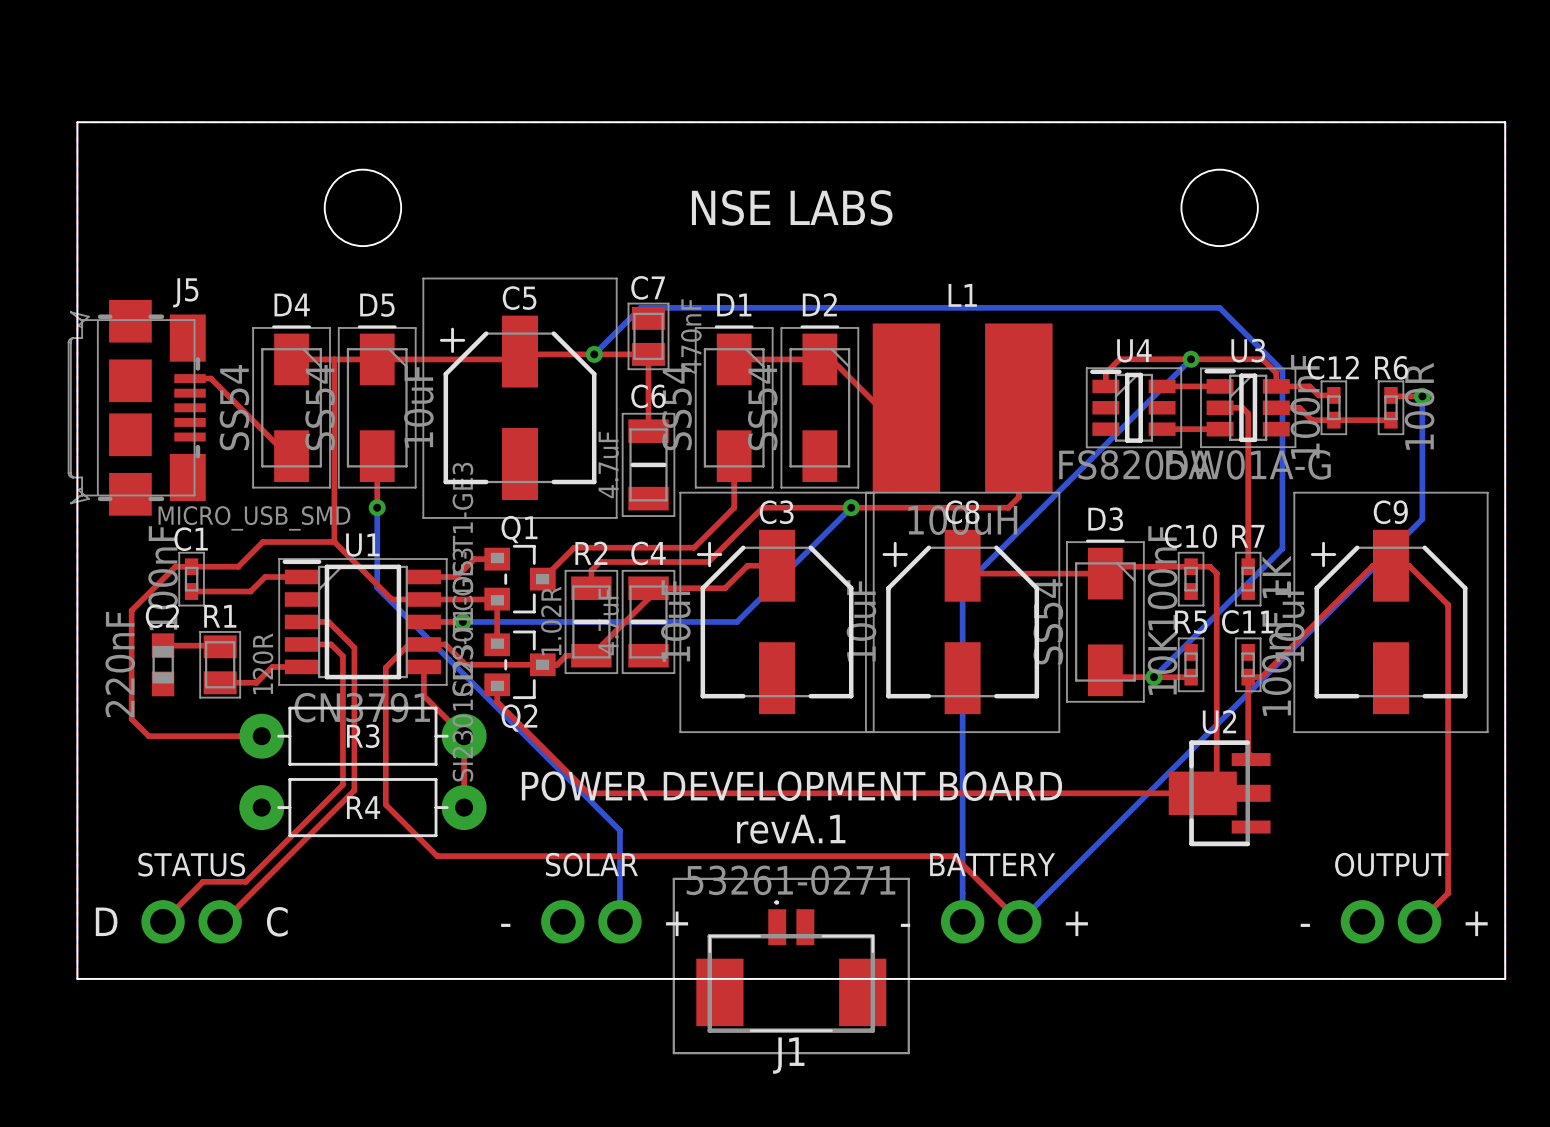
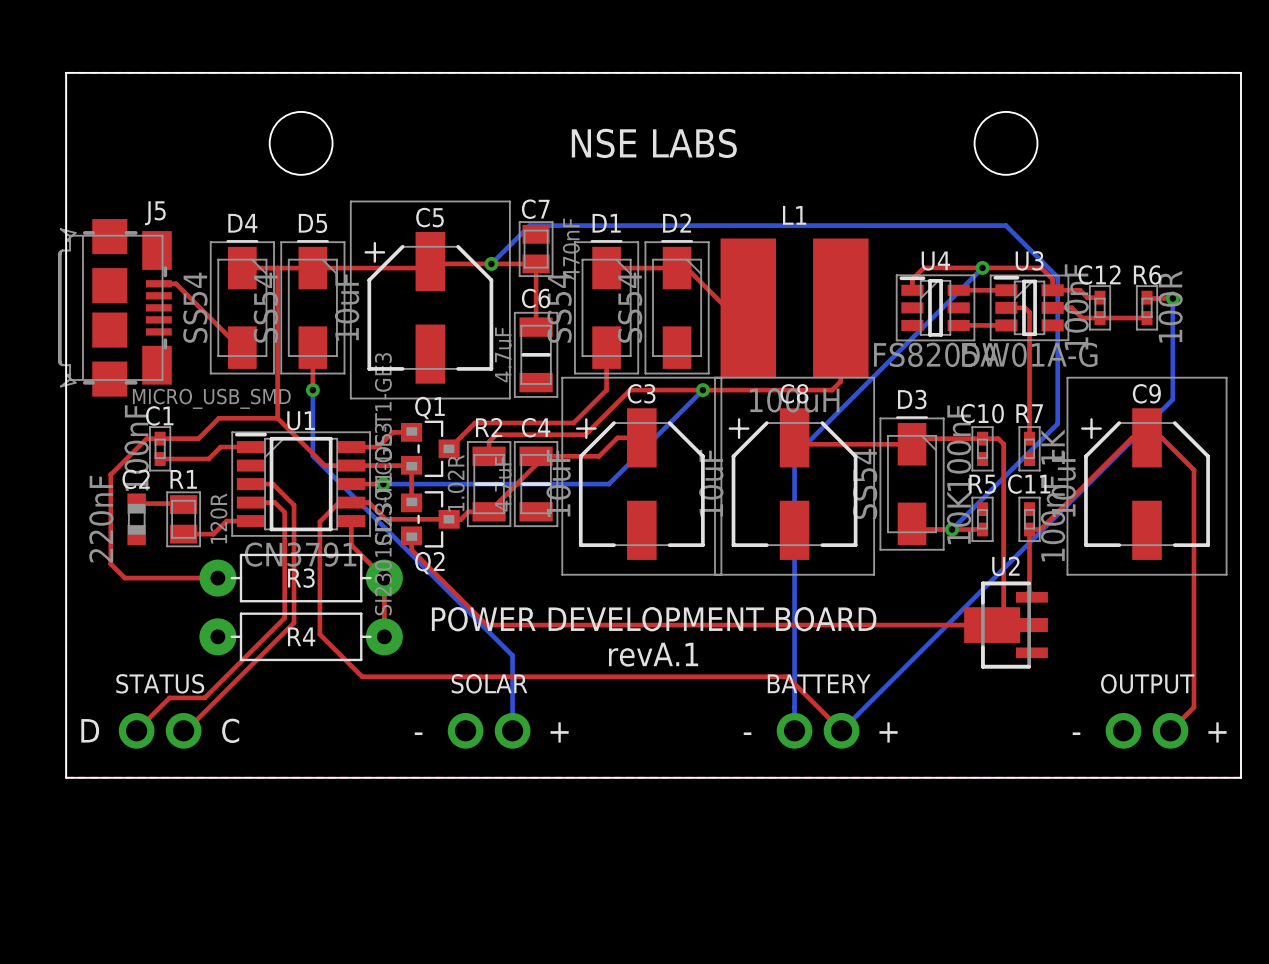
J1: 53261-0271 (791, 965) -> none

